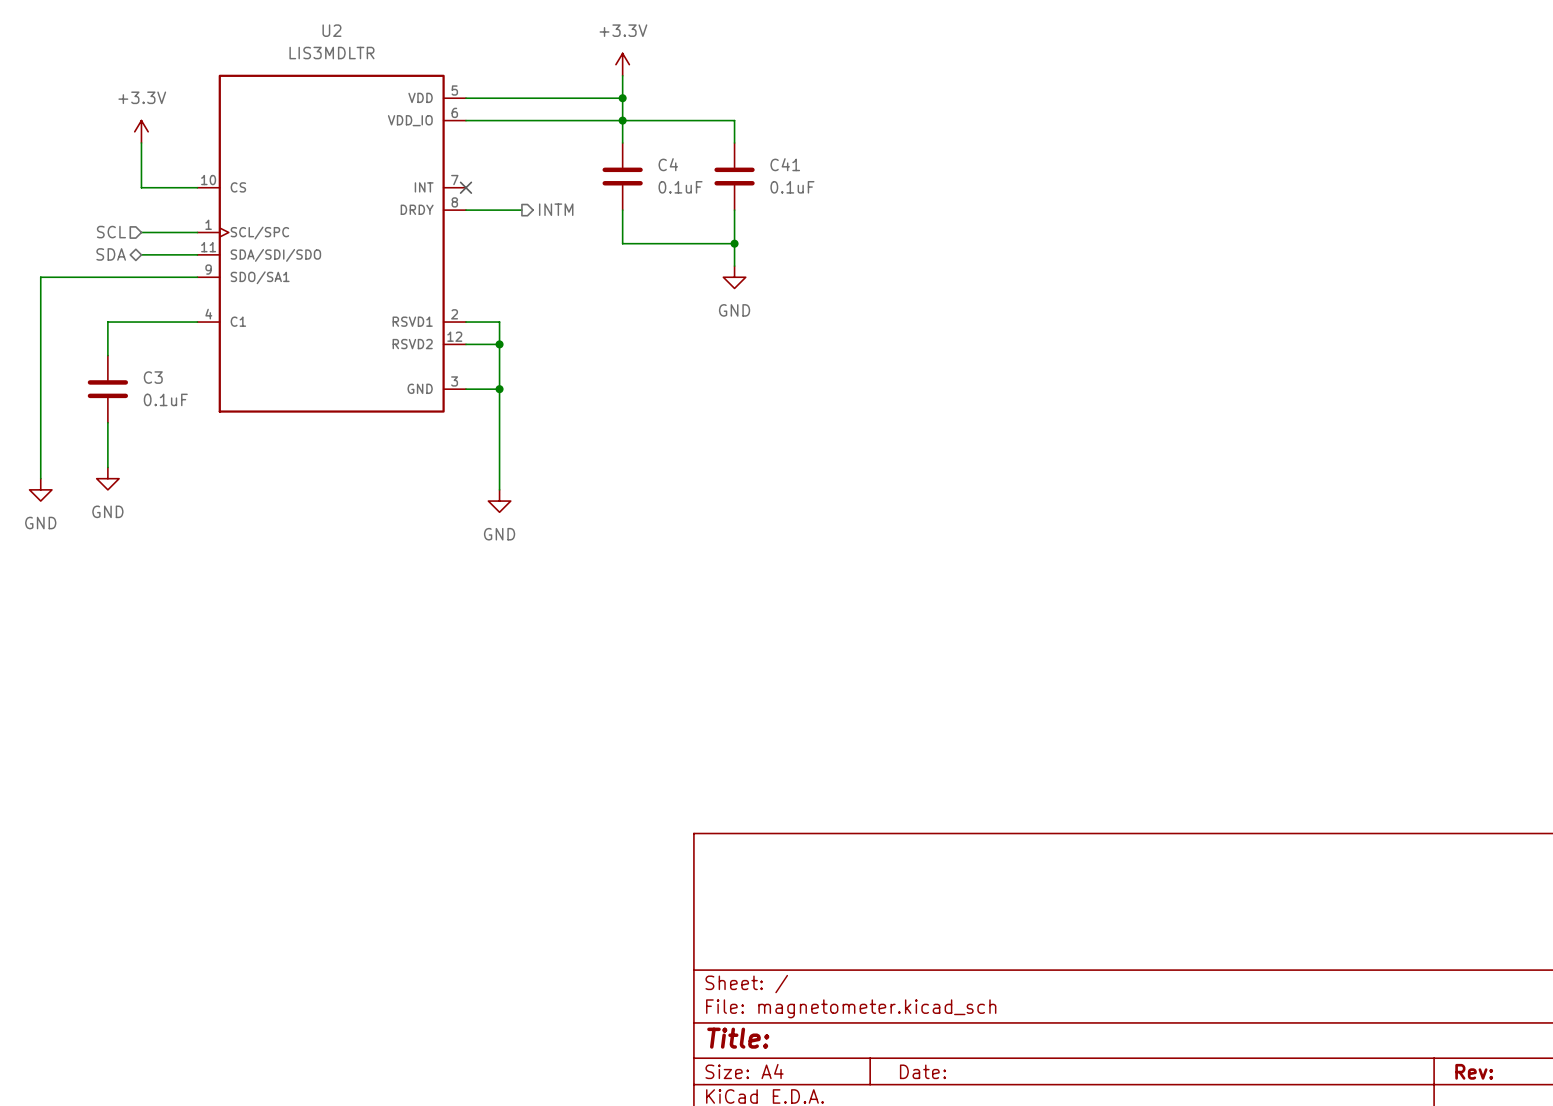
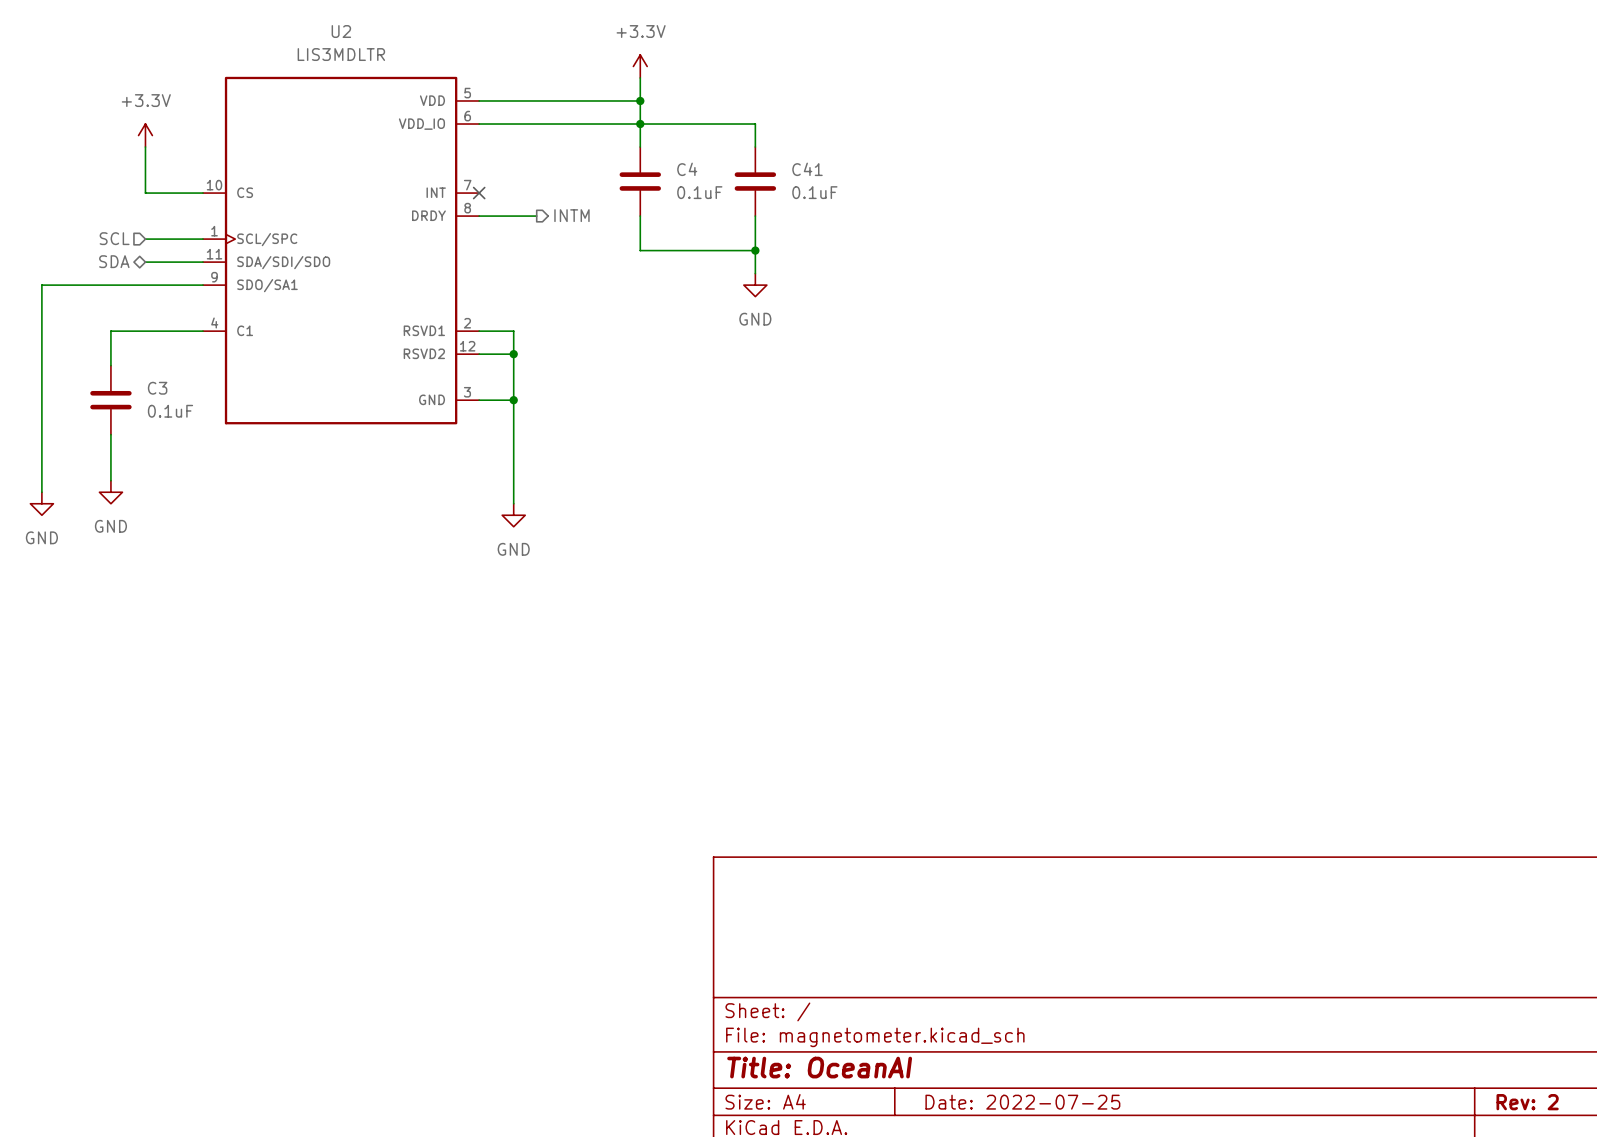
title block: Title: (738, 1038) -> Title: OceanAI (819, 1067)
title block: Date: (922, 1071) -> Date: 2022-07-25 (1022, 1102)
title block: Rev: (1474, 1071) -> Rev: 2 (1527, 1102)

